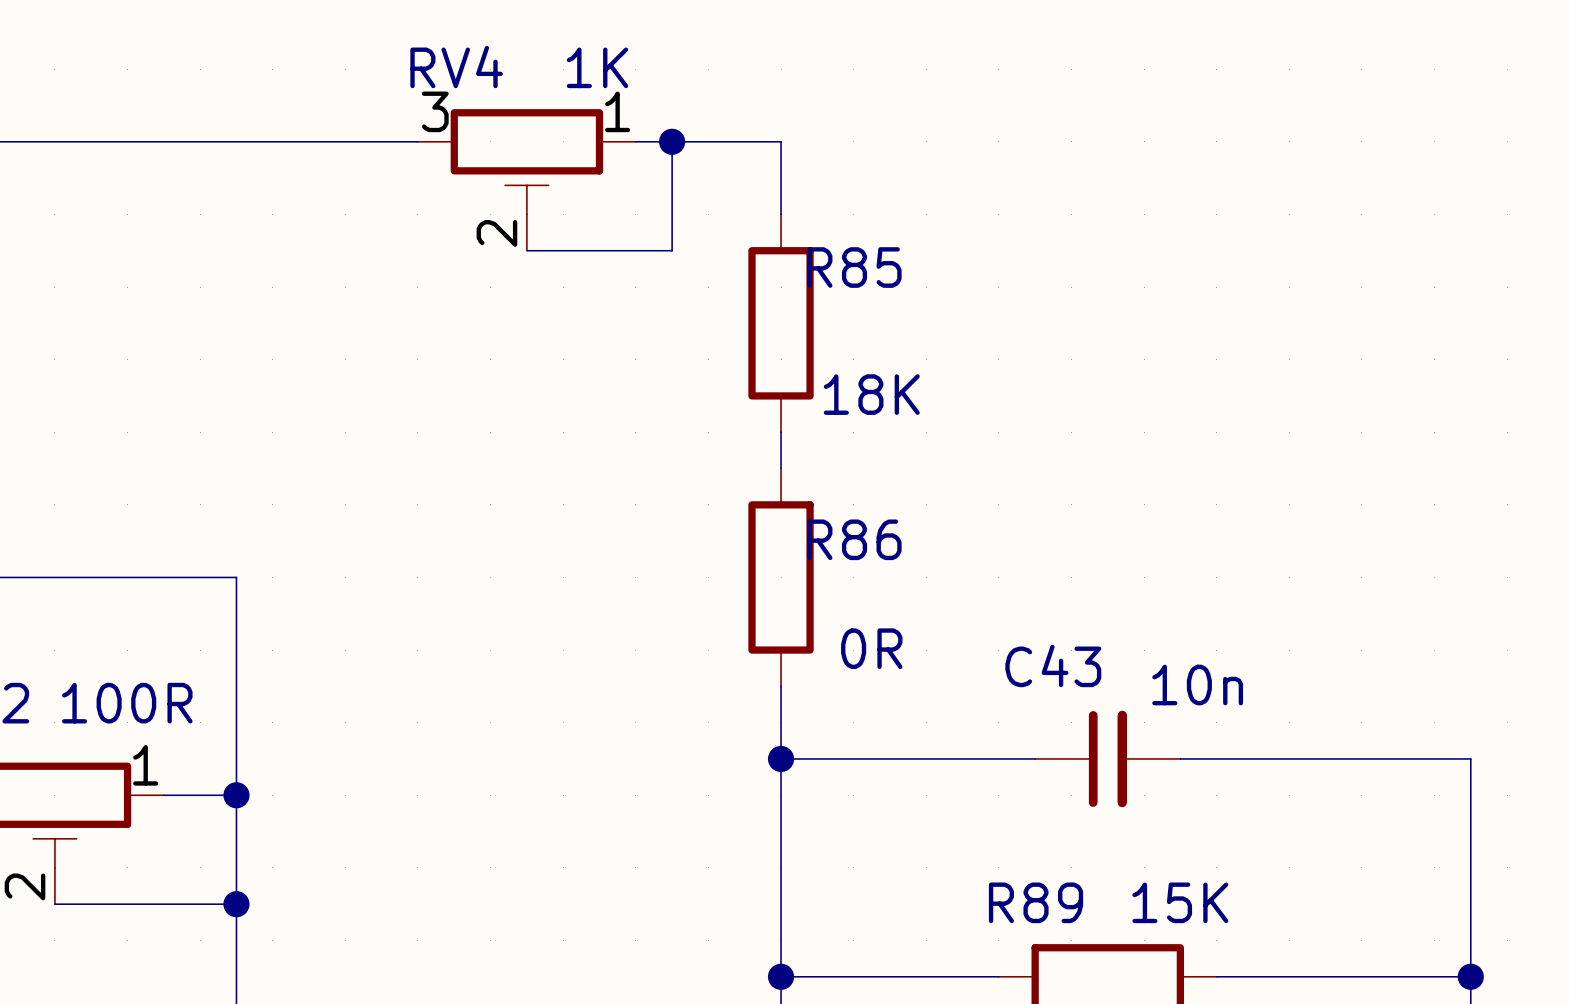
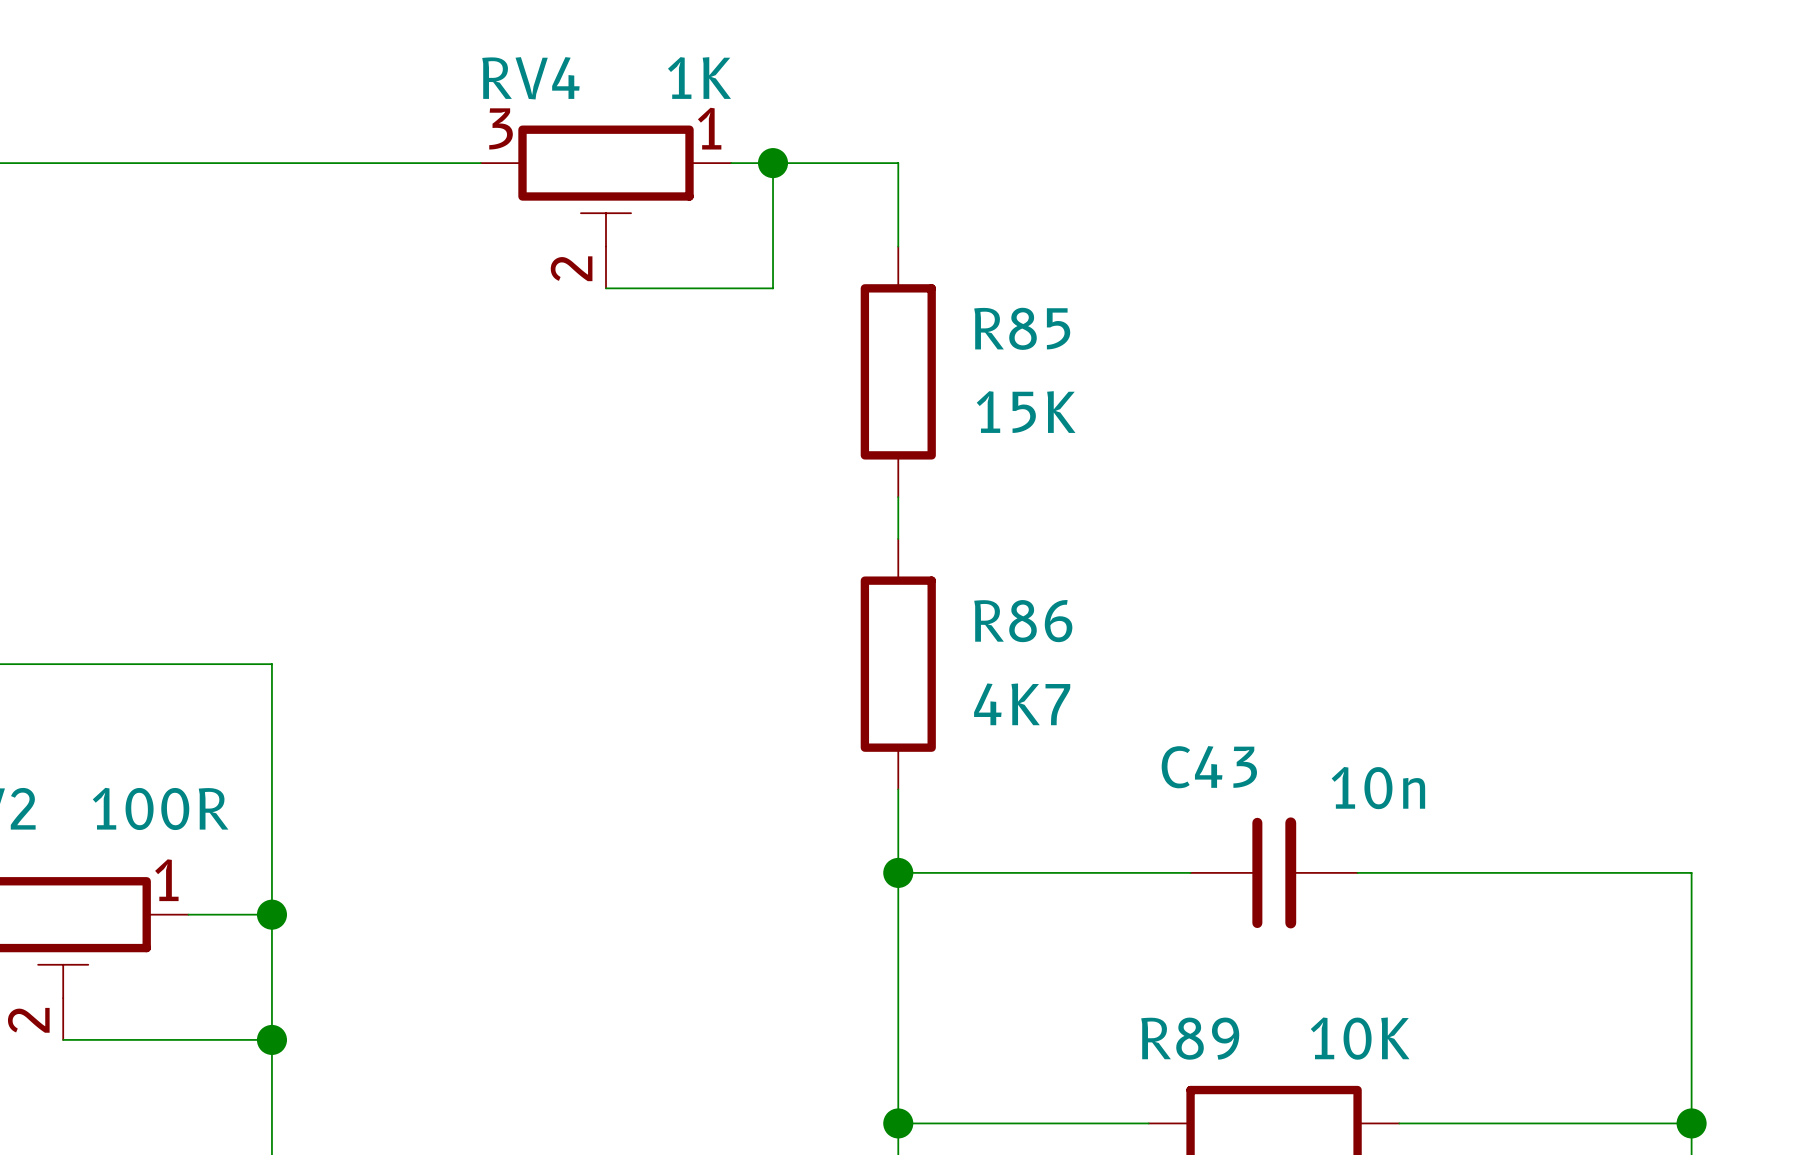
R85 name position: R85 (854, 267) -> R85 (1022, 328)
R85 value: 18K (871, 394) -> 15K (1026, 412)
R86 name position: R86 (854, 539) -> R86 (1023, 621)
R86 value: 0R (871, 648) -> 4K7 (1022, 704)
R89 value: 15K (1180, 902) -> 10K (1360, 1038)

